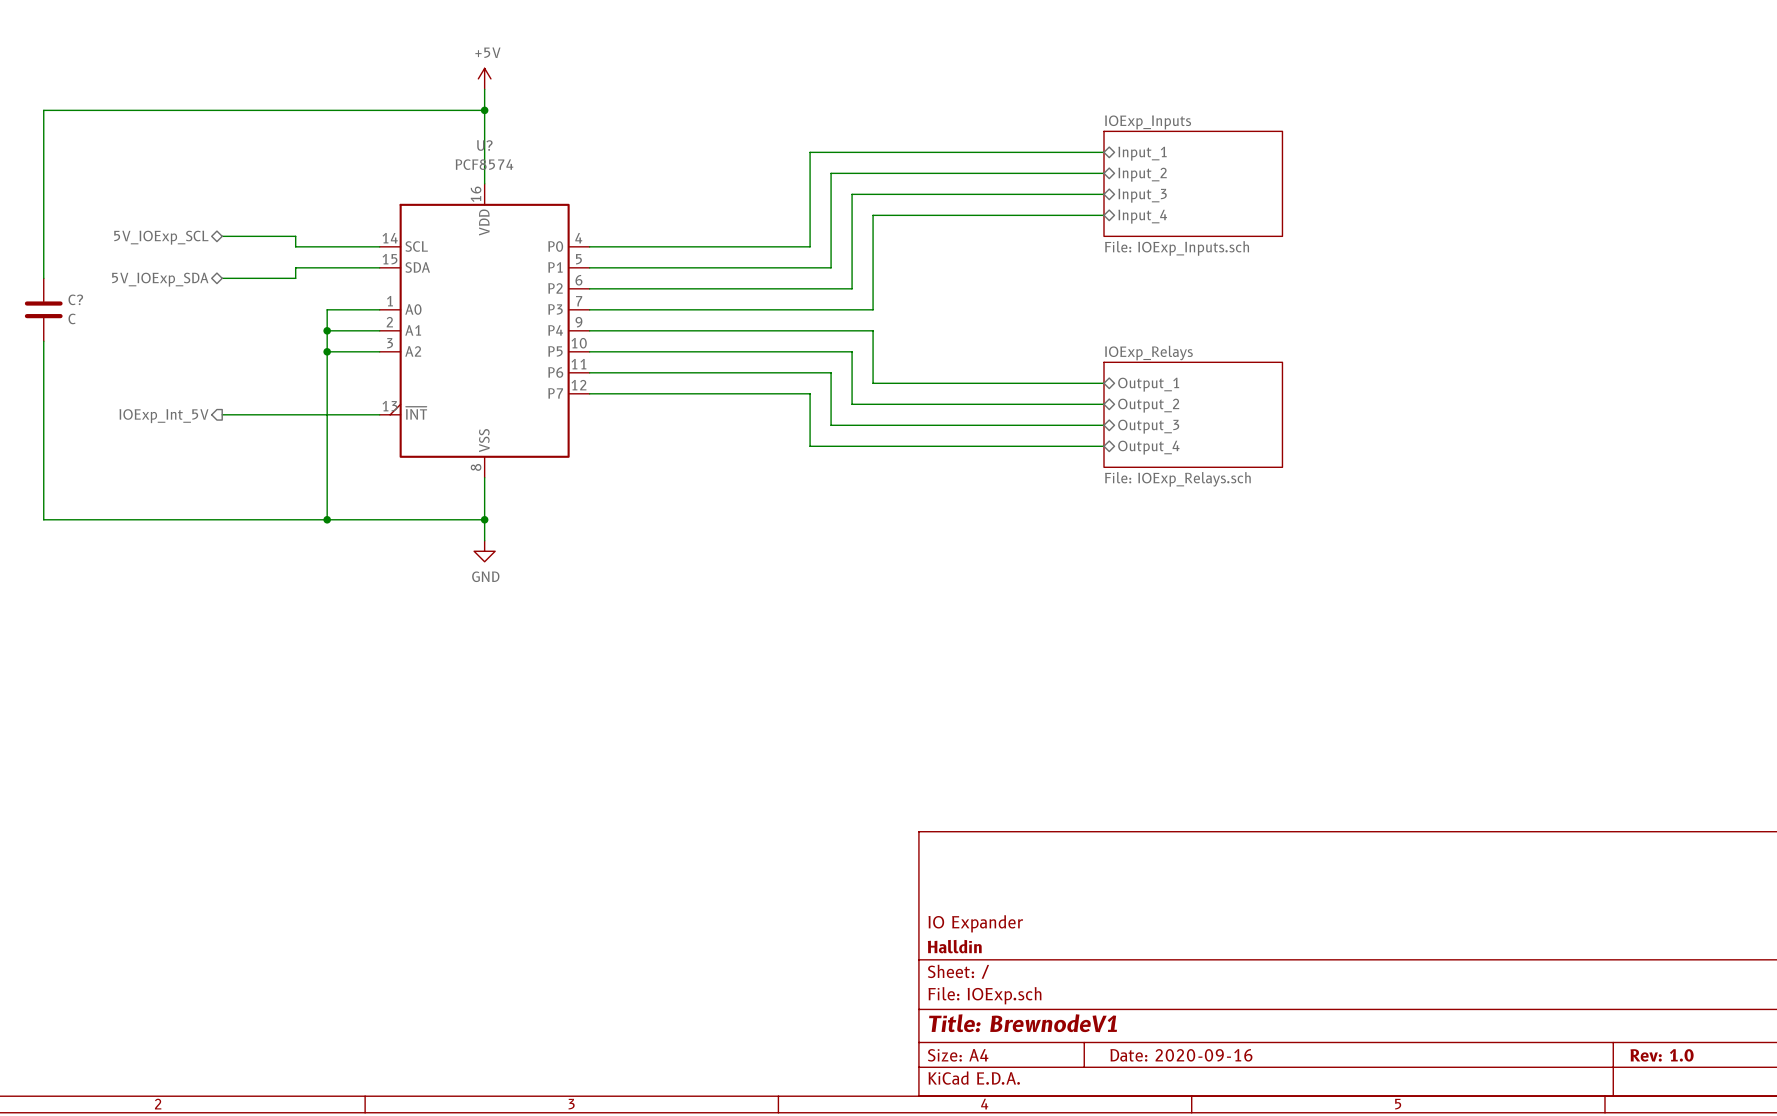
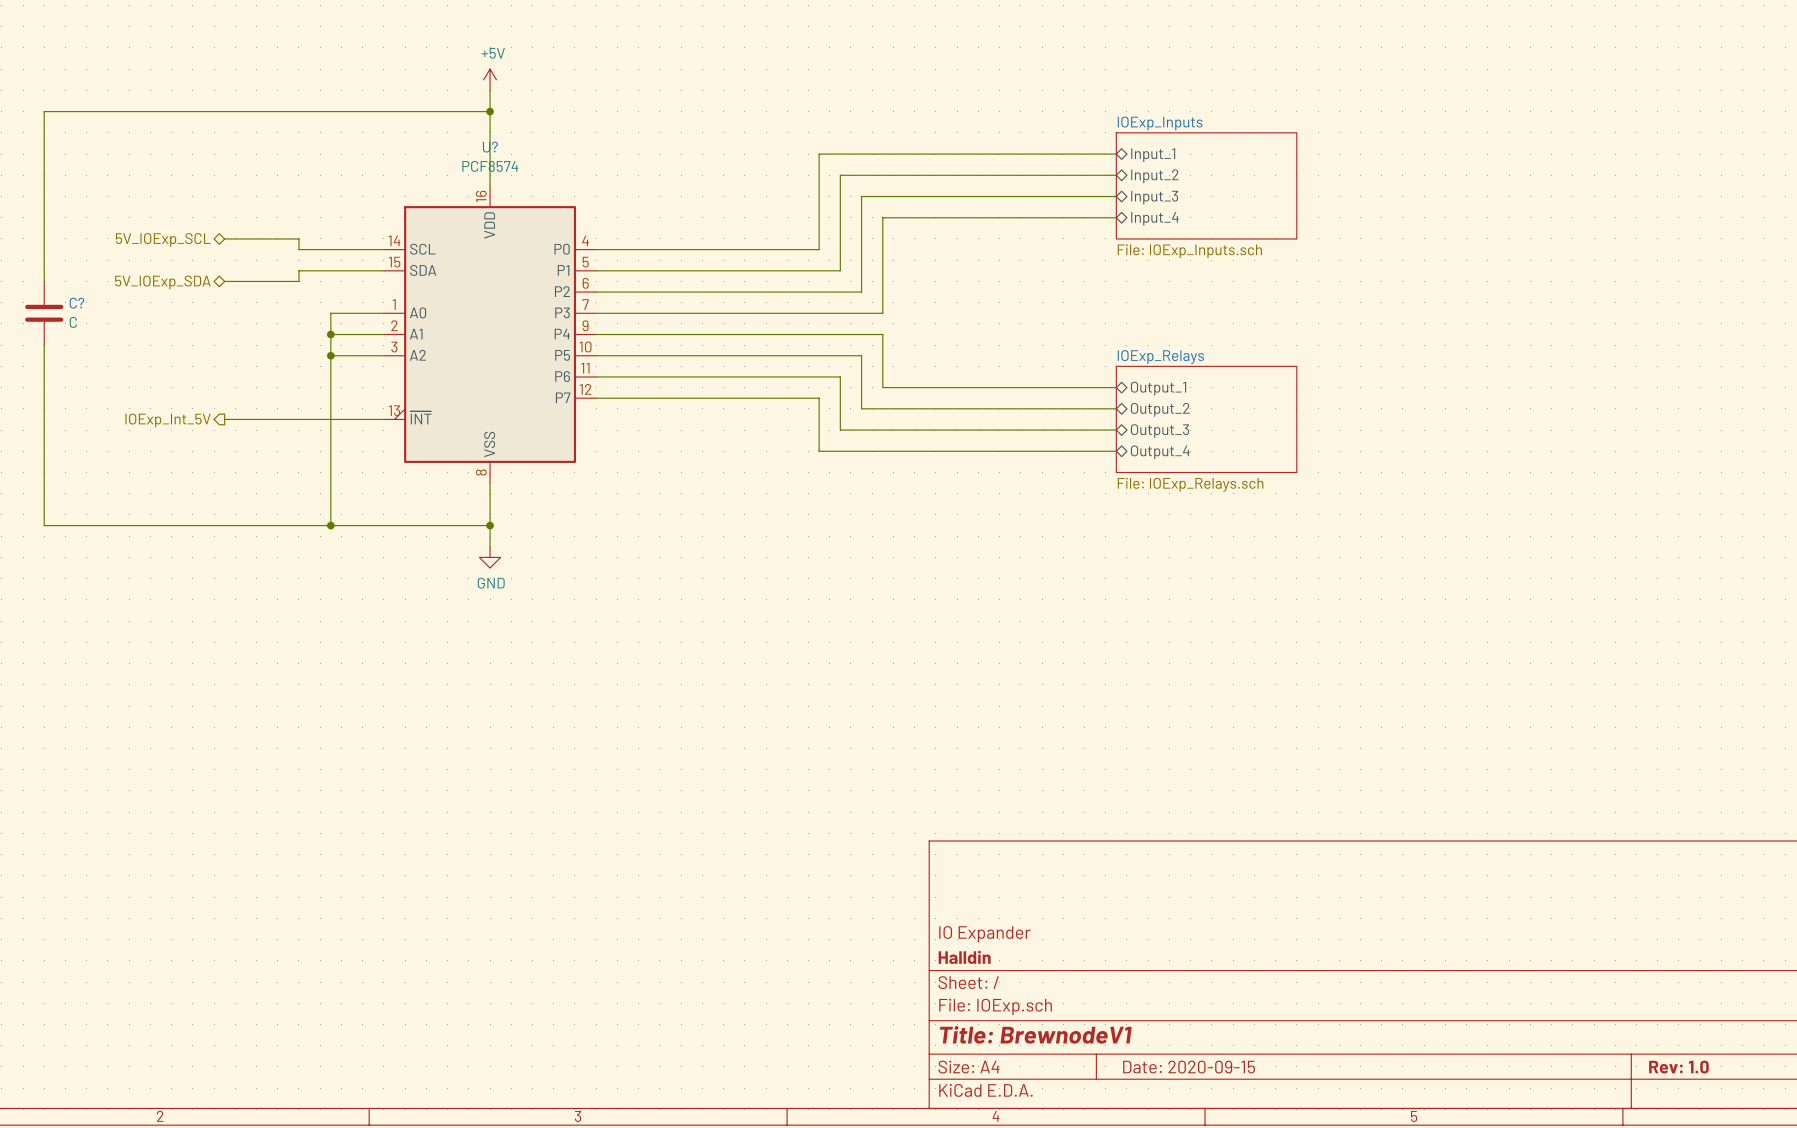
title block: Date: 2020-09-16 (1181, 1055) -> Date: 2020-09-15 (1189, 1067)

